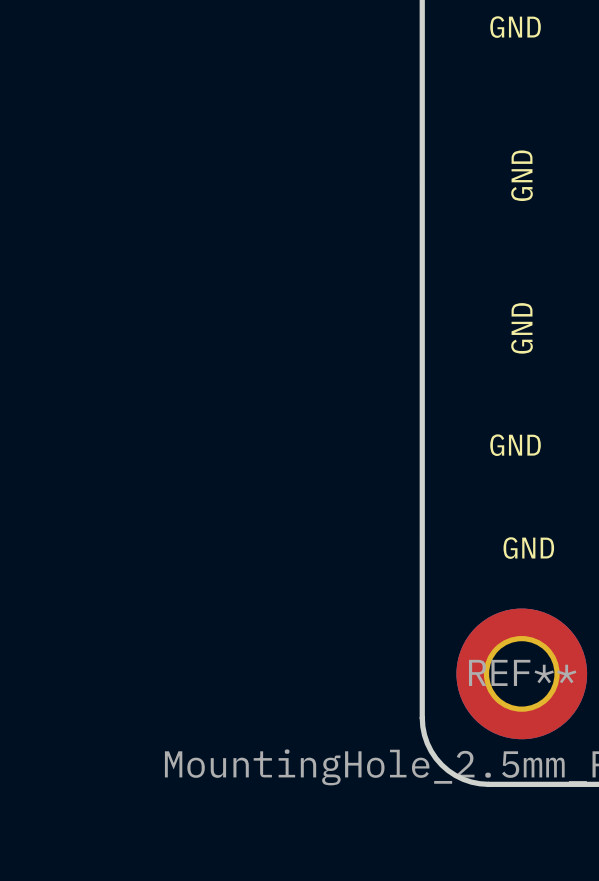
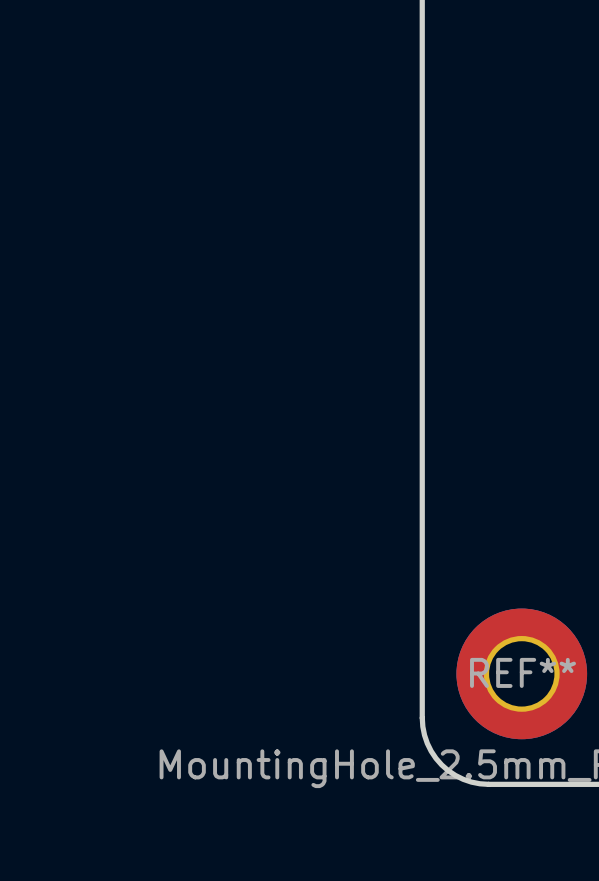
text: GND (515, 27) -> none
text: GND (522, 175) -> none
text: GND (522, 328) -> none
text: GND (515, 445) -> none
text: GND (528, 548) -> none

